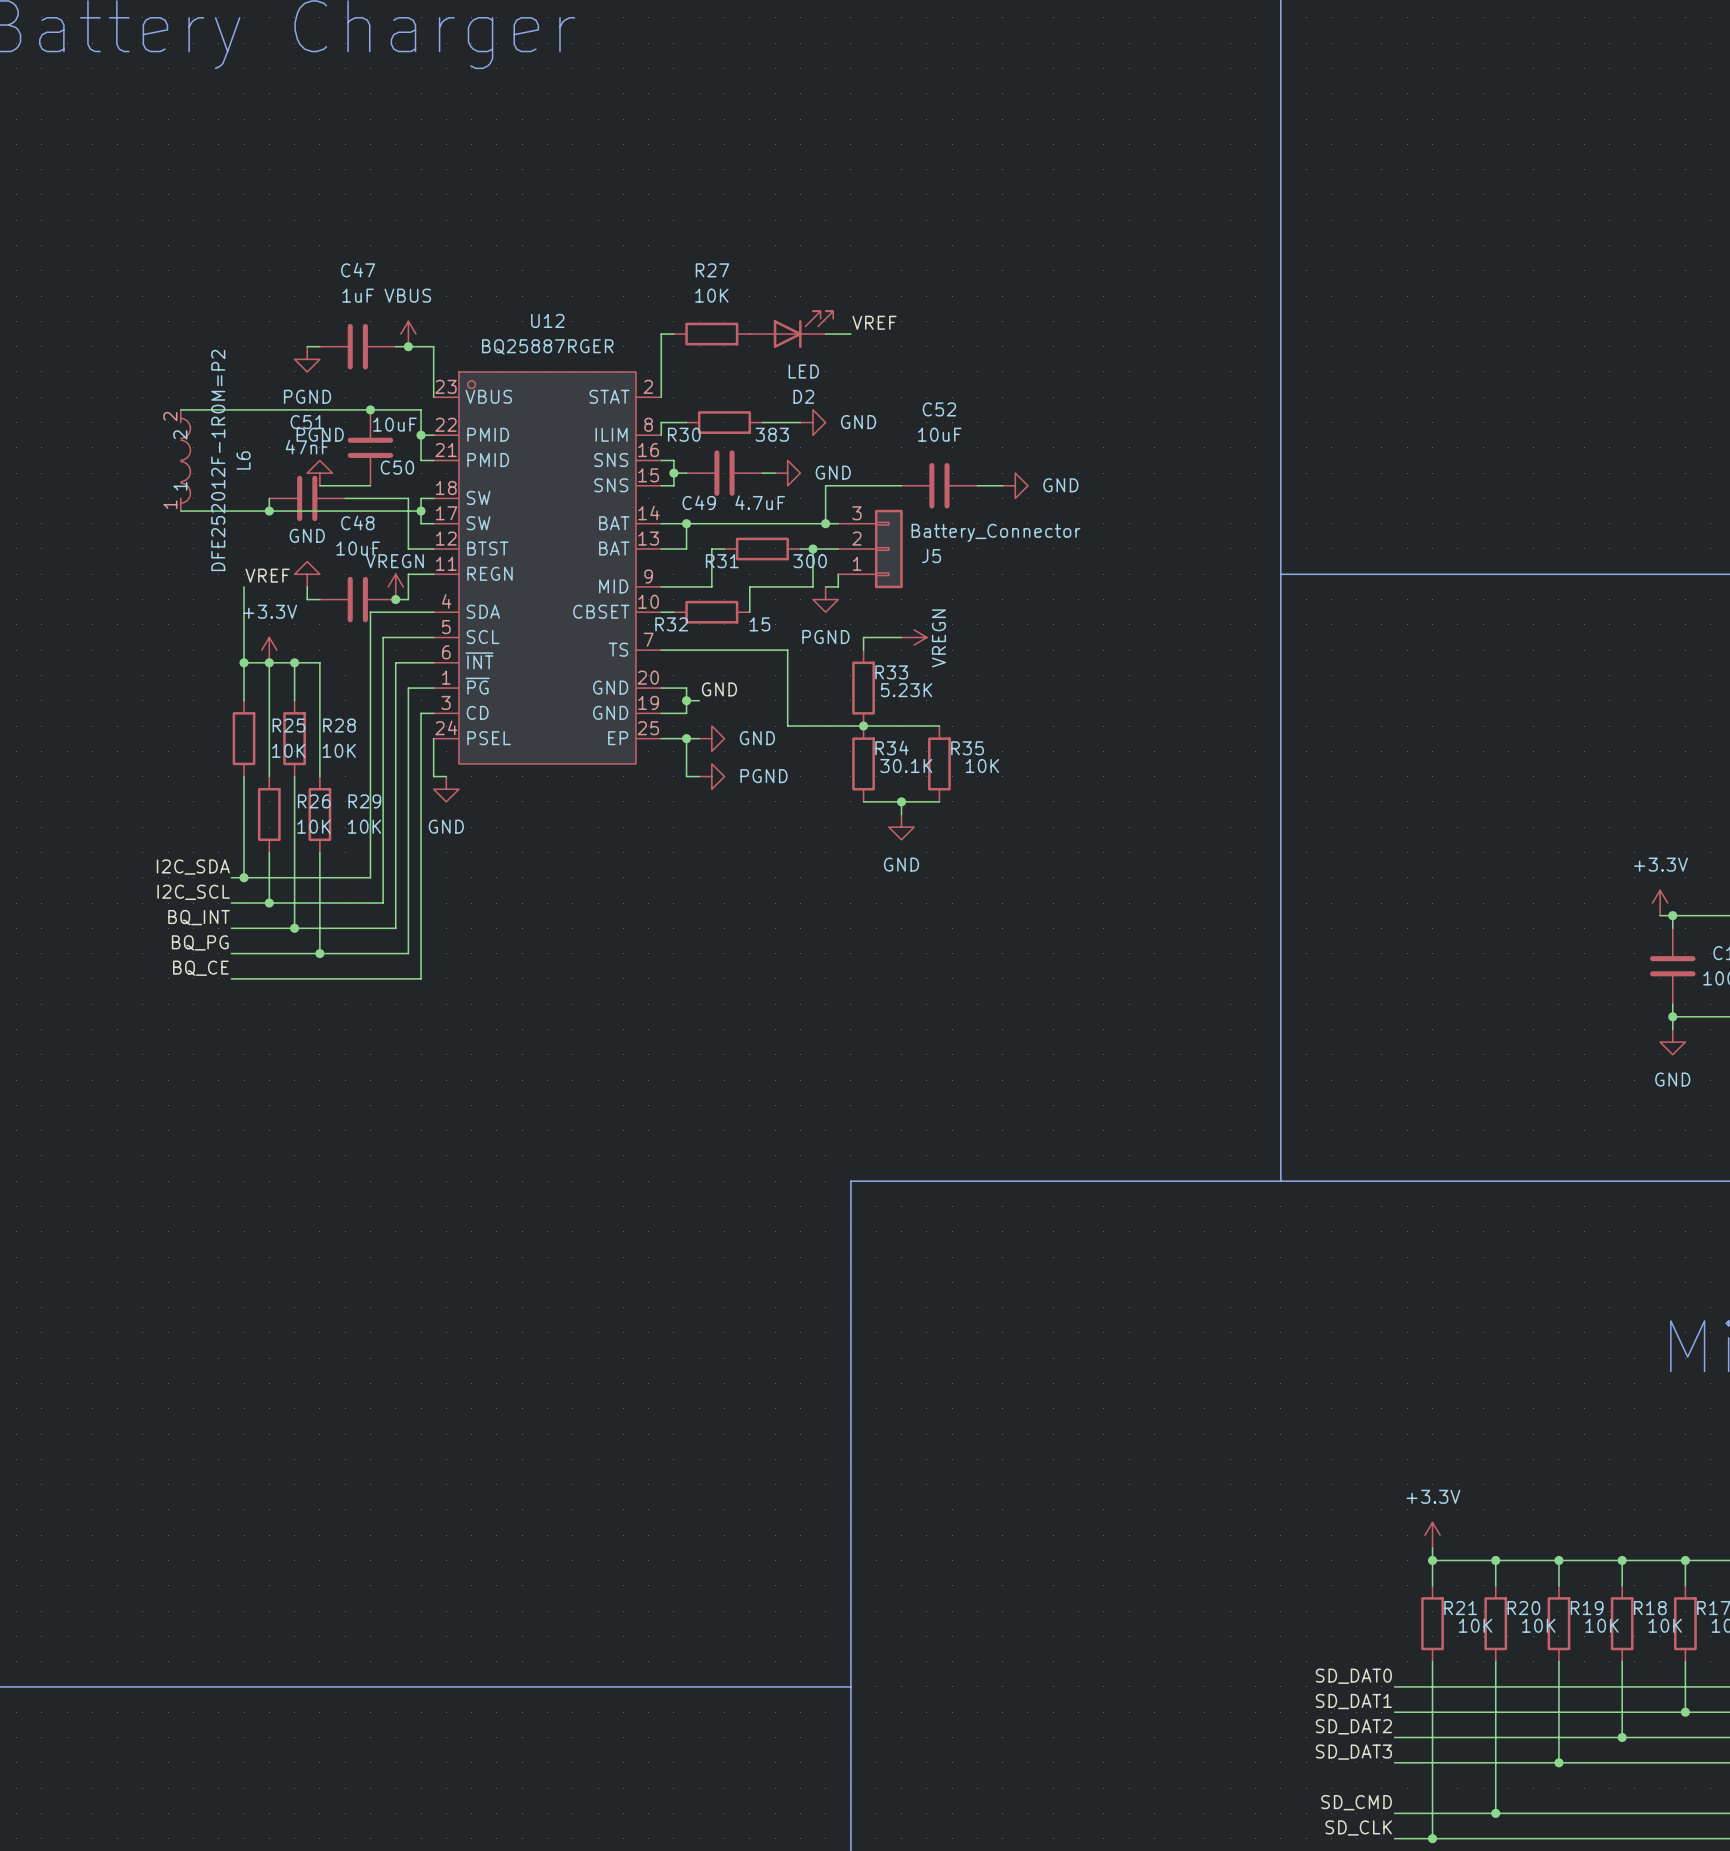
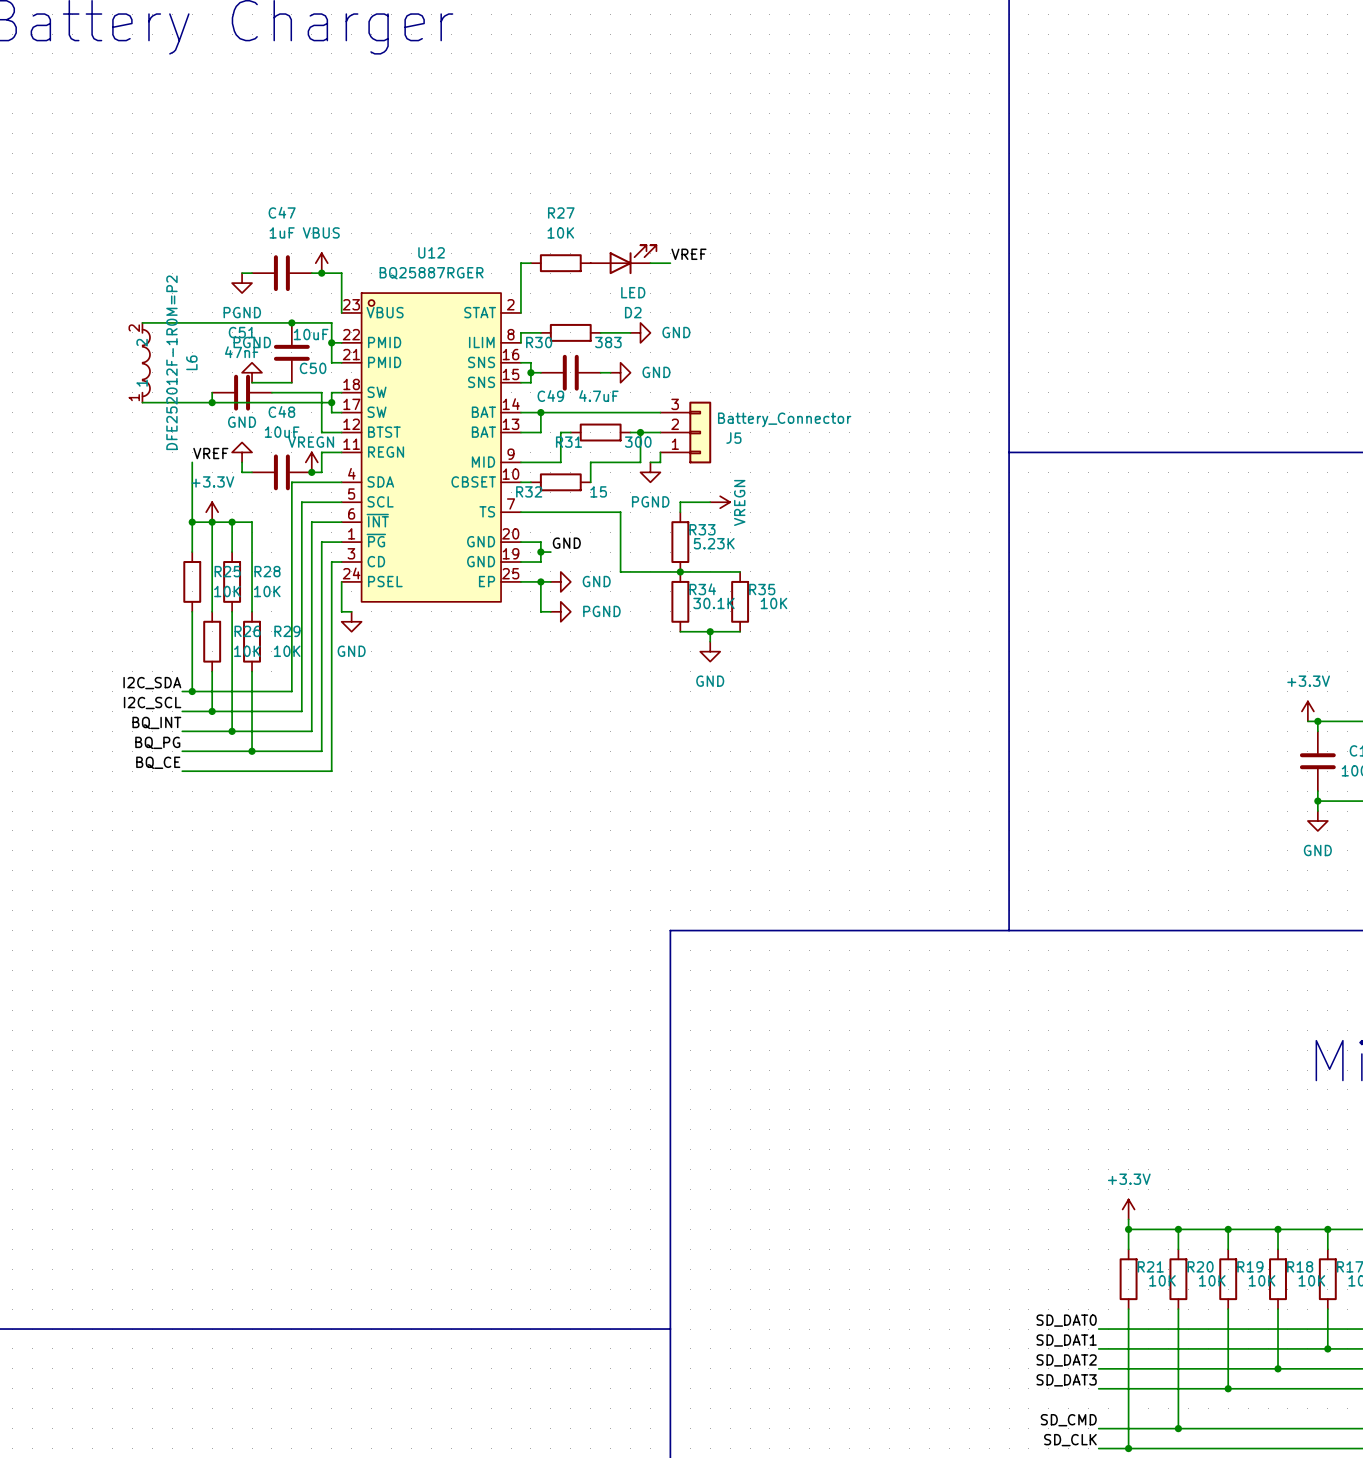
wire: (901, 485) (825, 485) (825, 523) -> none
C52: 10uF (939, 485) -> none
wire: (977, 485) (1002, 485) -> none
power symbol: GND (1015, 485) -> none
junction: (825, 523) -> none

